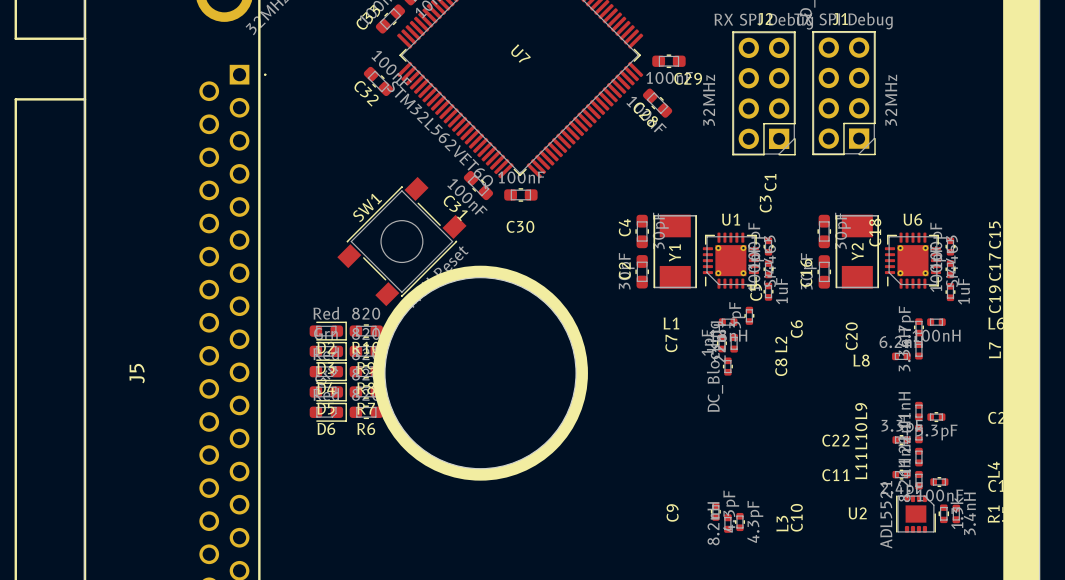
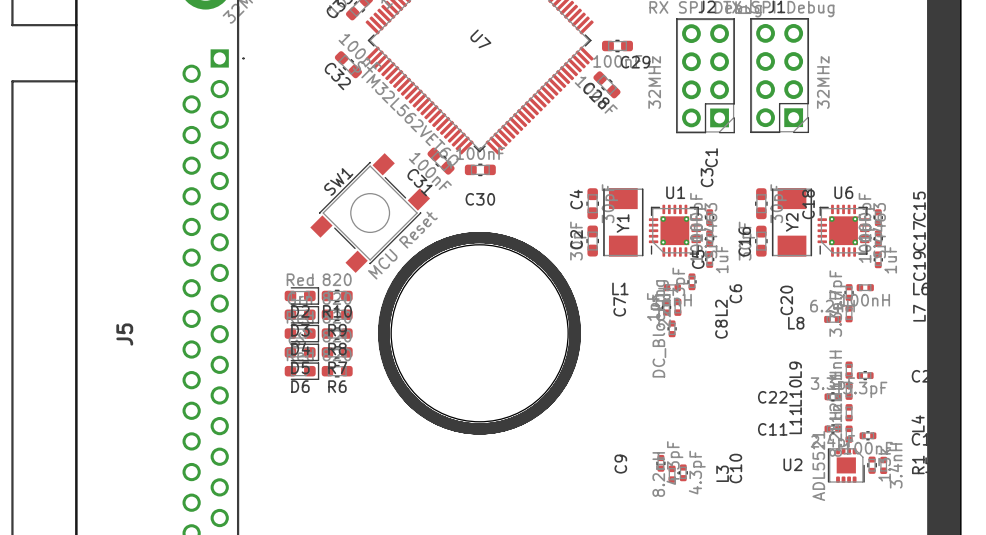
drawing: none -> [377, 232, 581, 435]
drawing: [373, 265, 588, 481] -> none
round board edge position: (480, 373) -> (479, 333)

